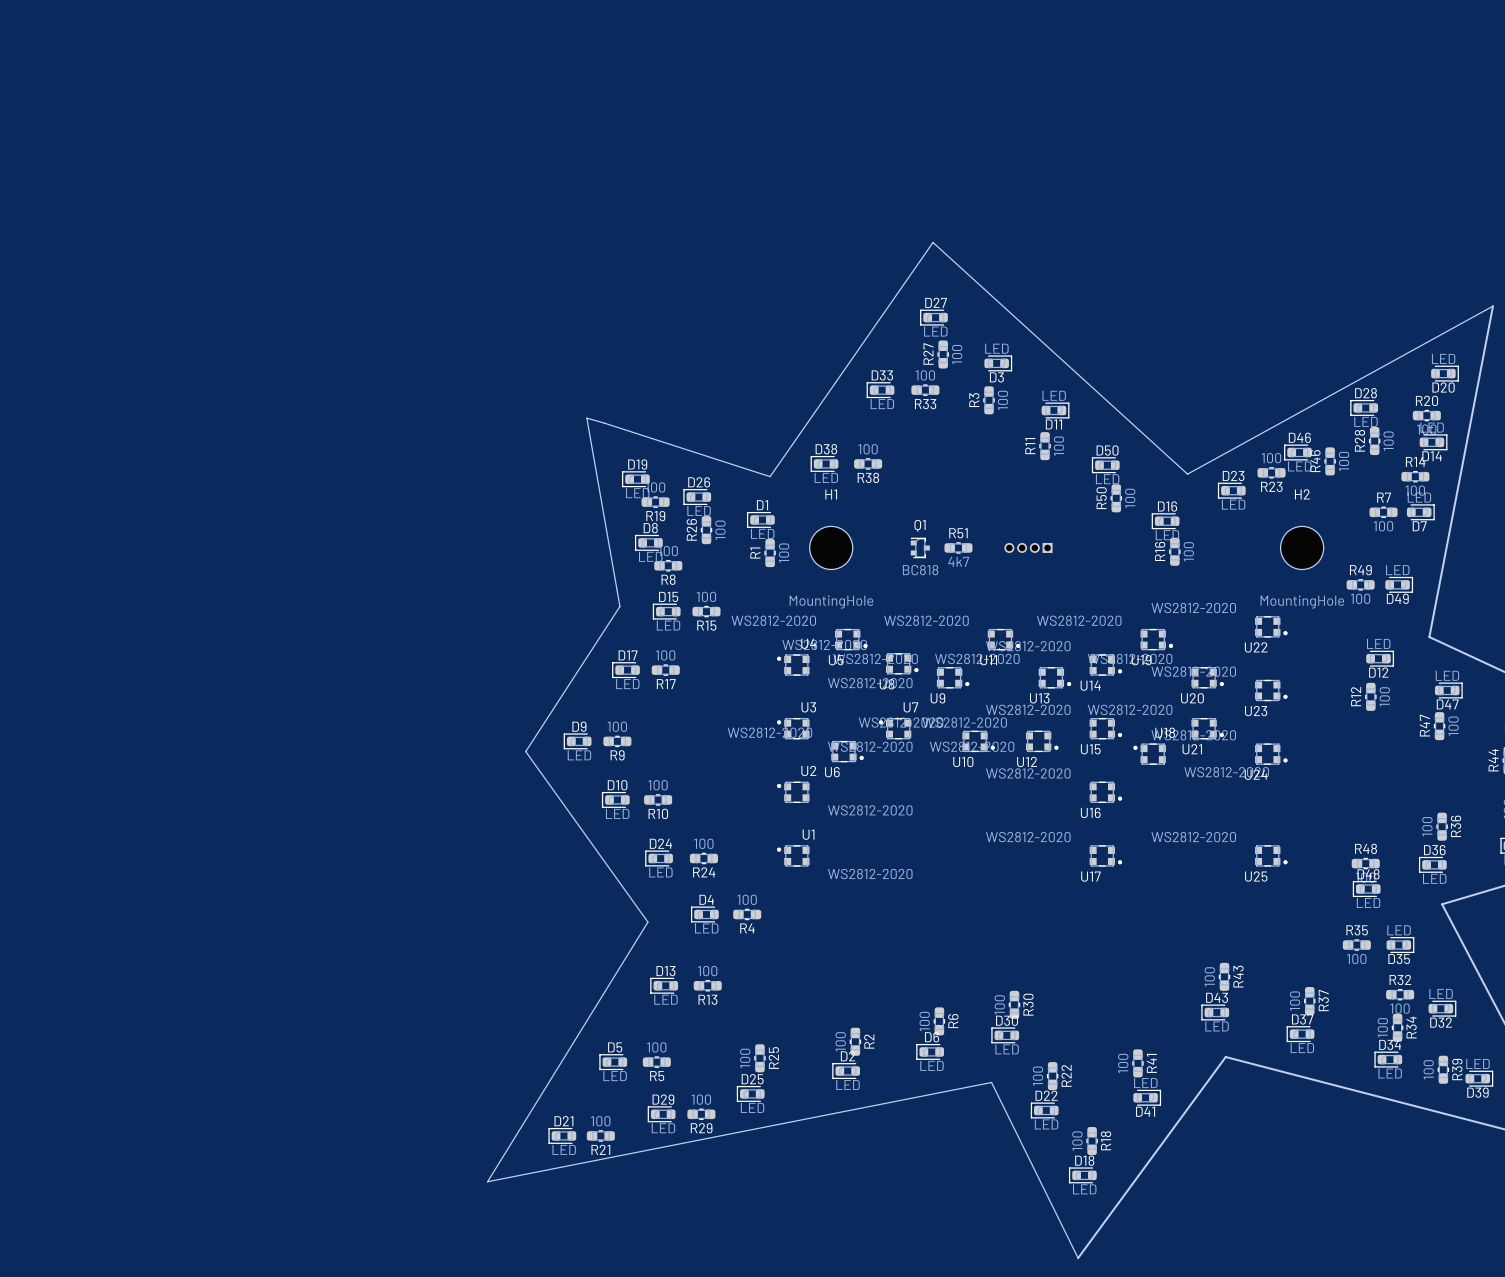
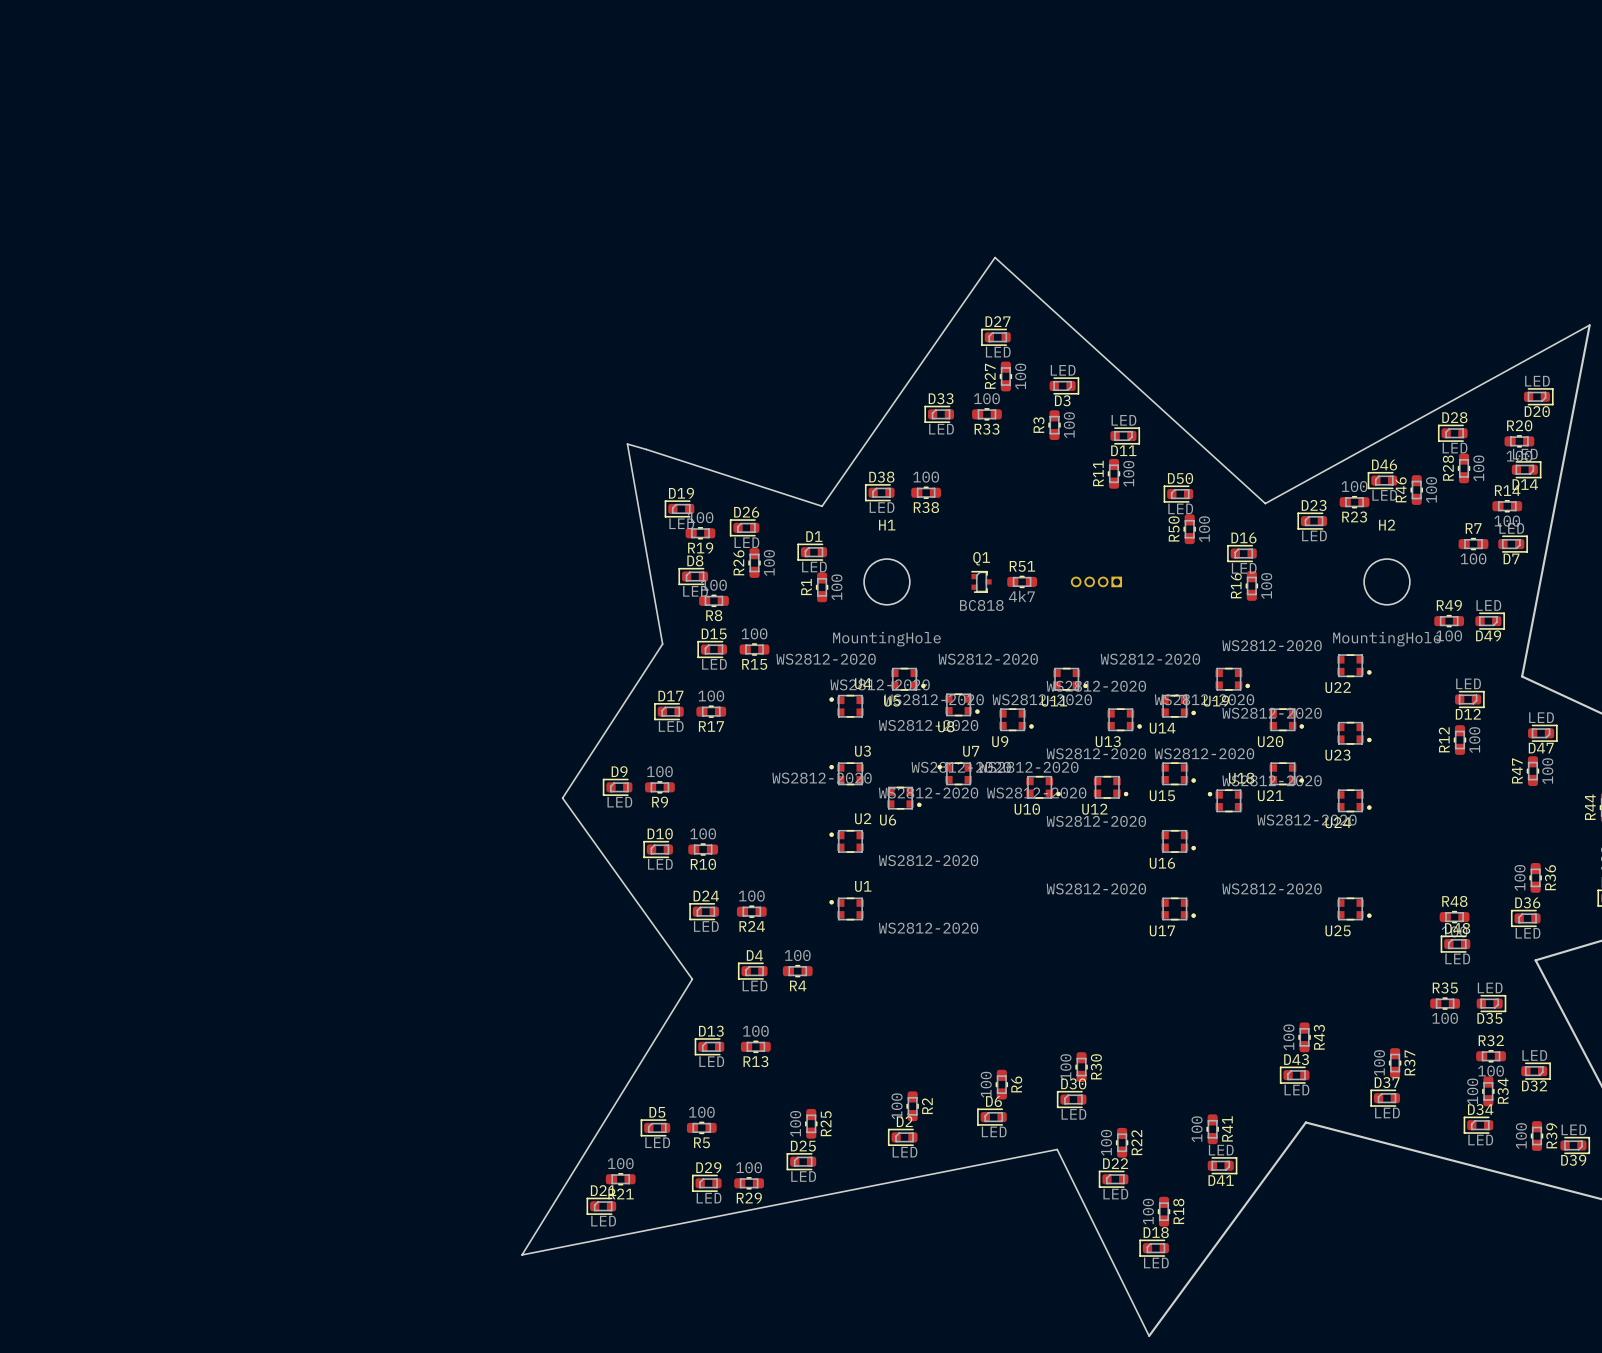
R21 position: (600, 1135) -> (620, 1179)

